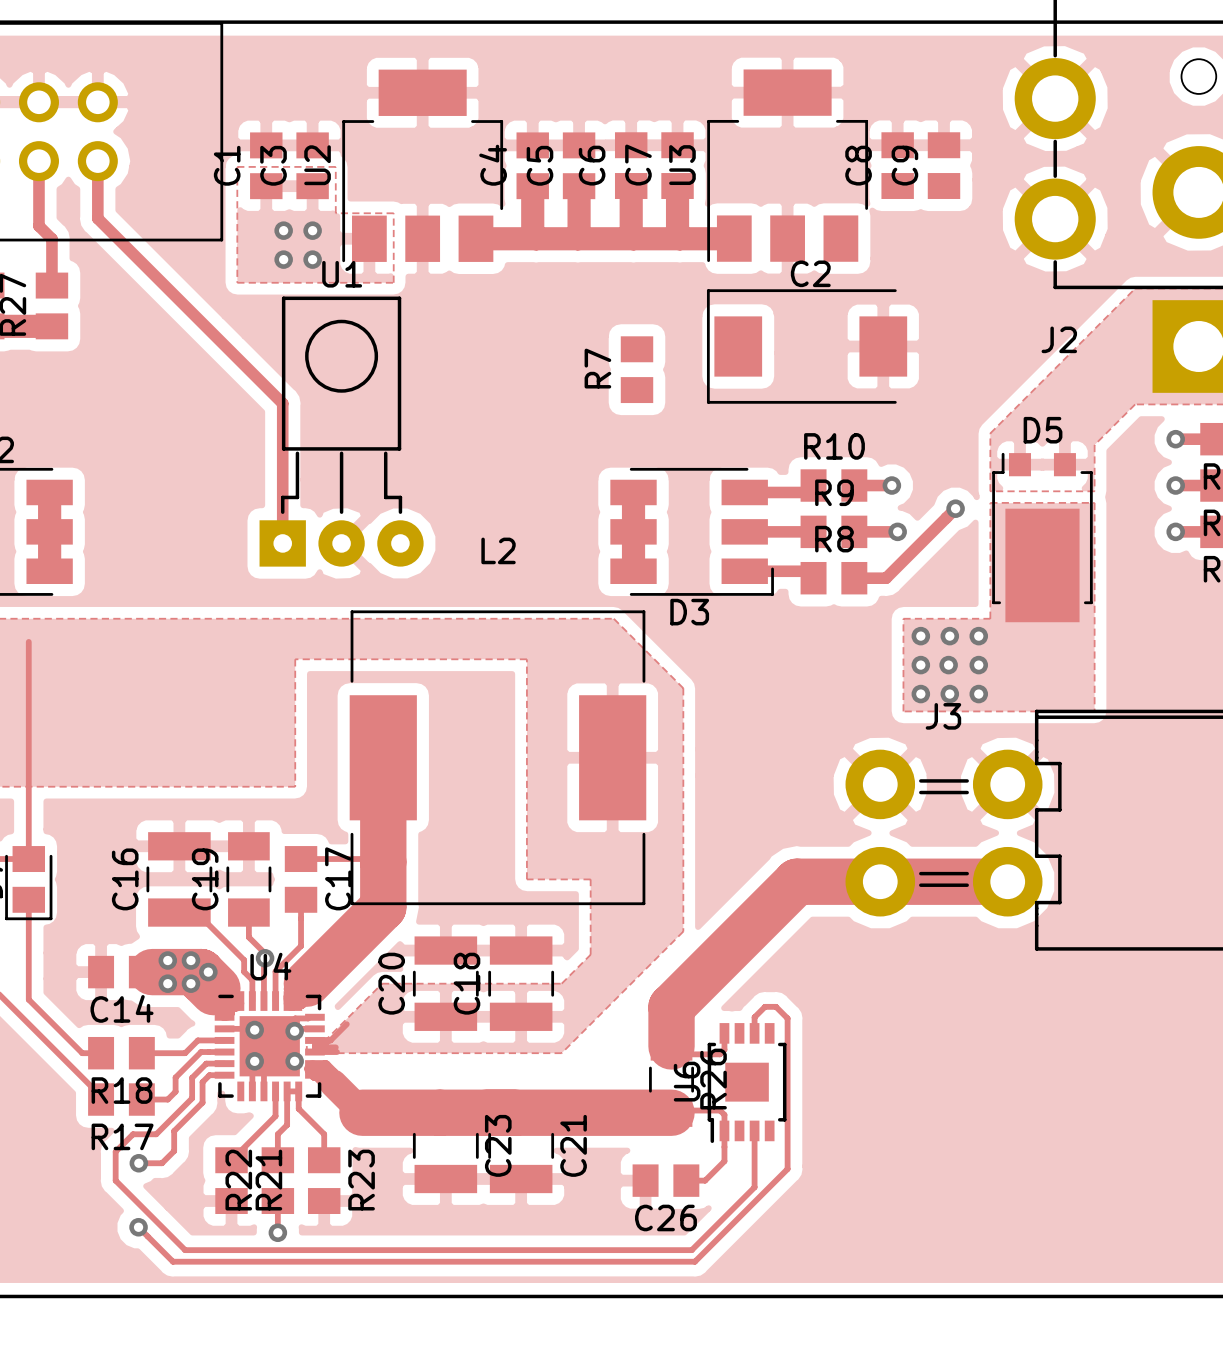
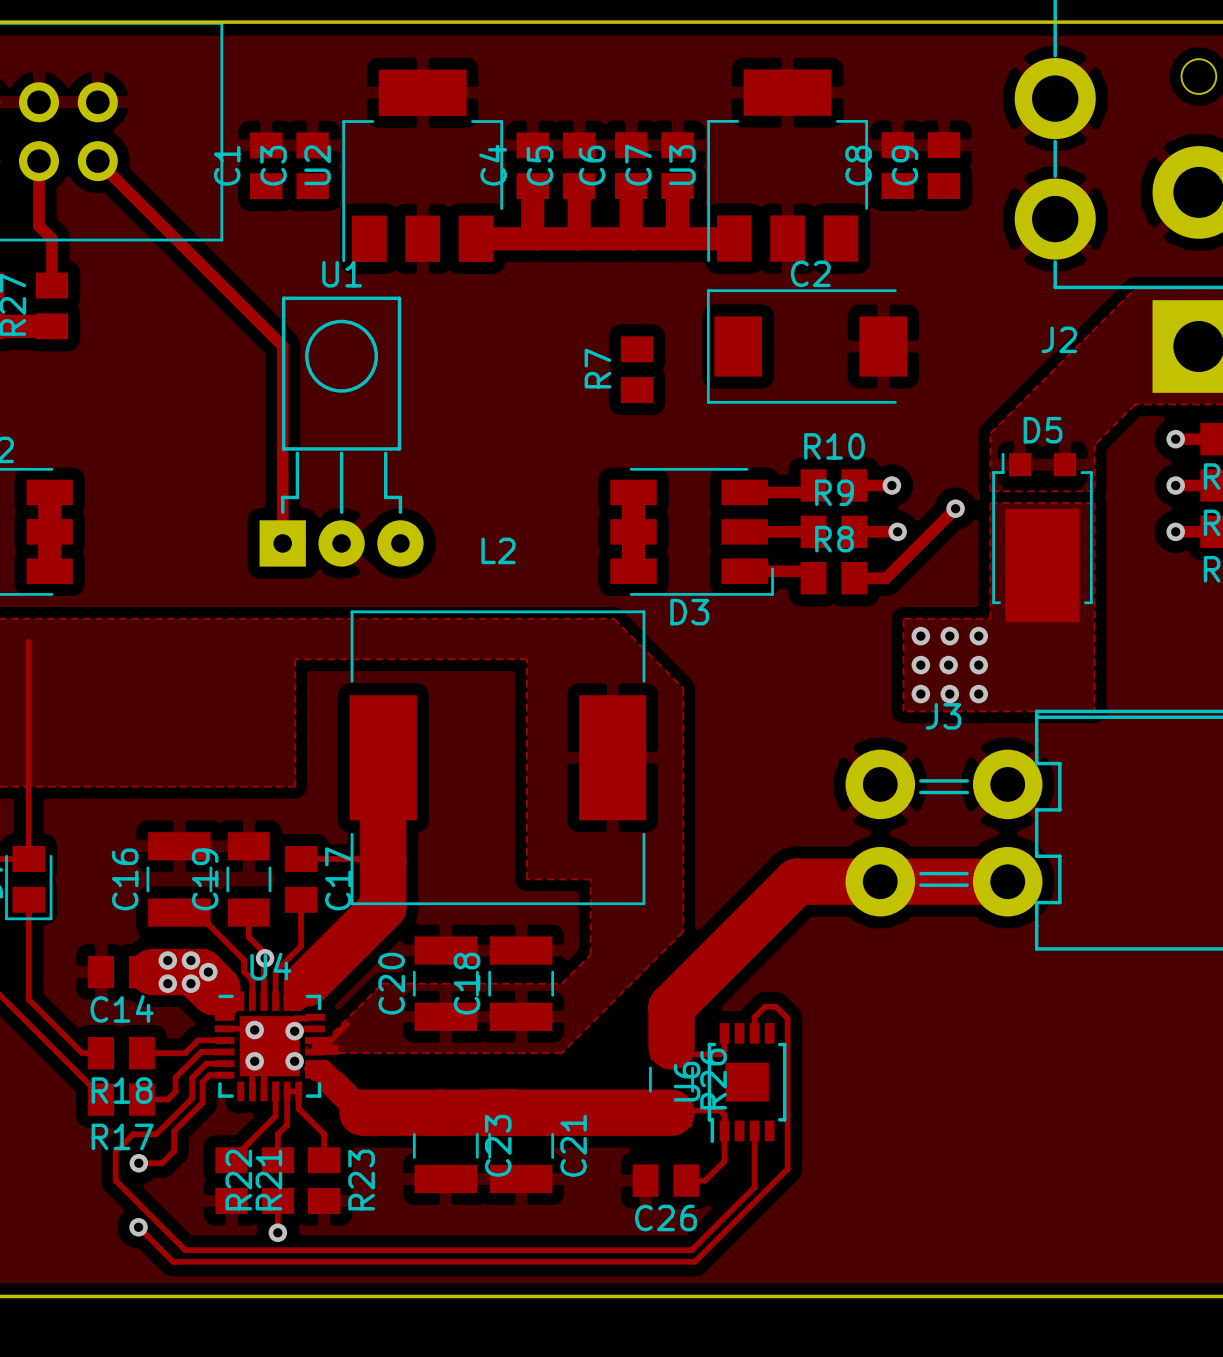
track: (97, 161) (97, 218) (282, 403) -> (97, 161) (282, 346) (282, 403)
zone outline: (237, 166) (335, 166) (335, 213) (393, 213) (393, 282) (237, 282) (237, 166) -> none
via: (283, 230) -> none
via: (312, 230) -> none
via: (283, 259) -> none
via: (312, 259) -> none

